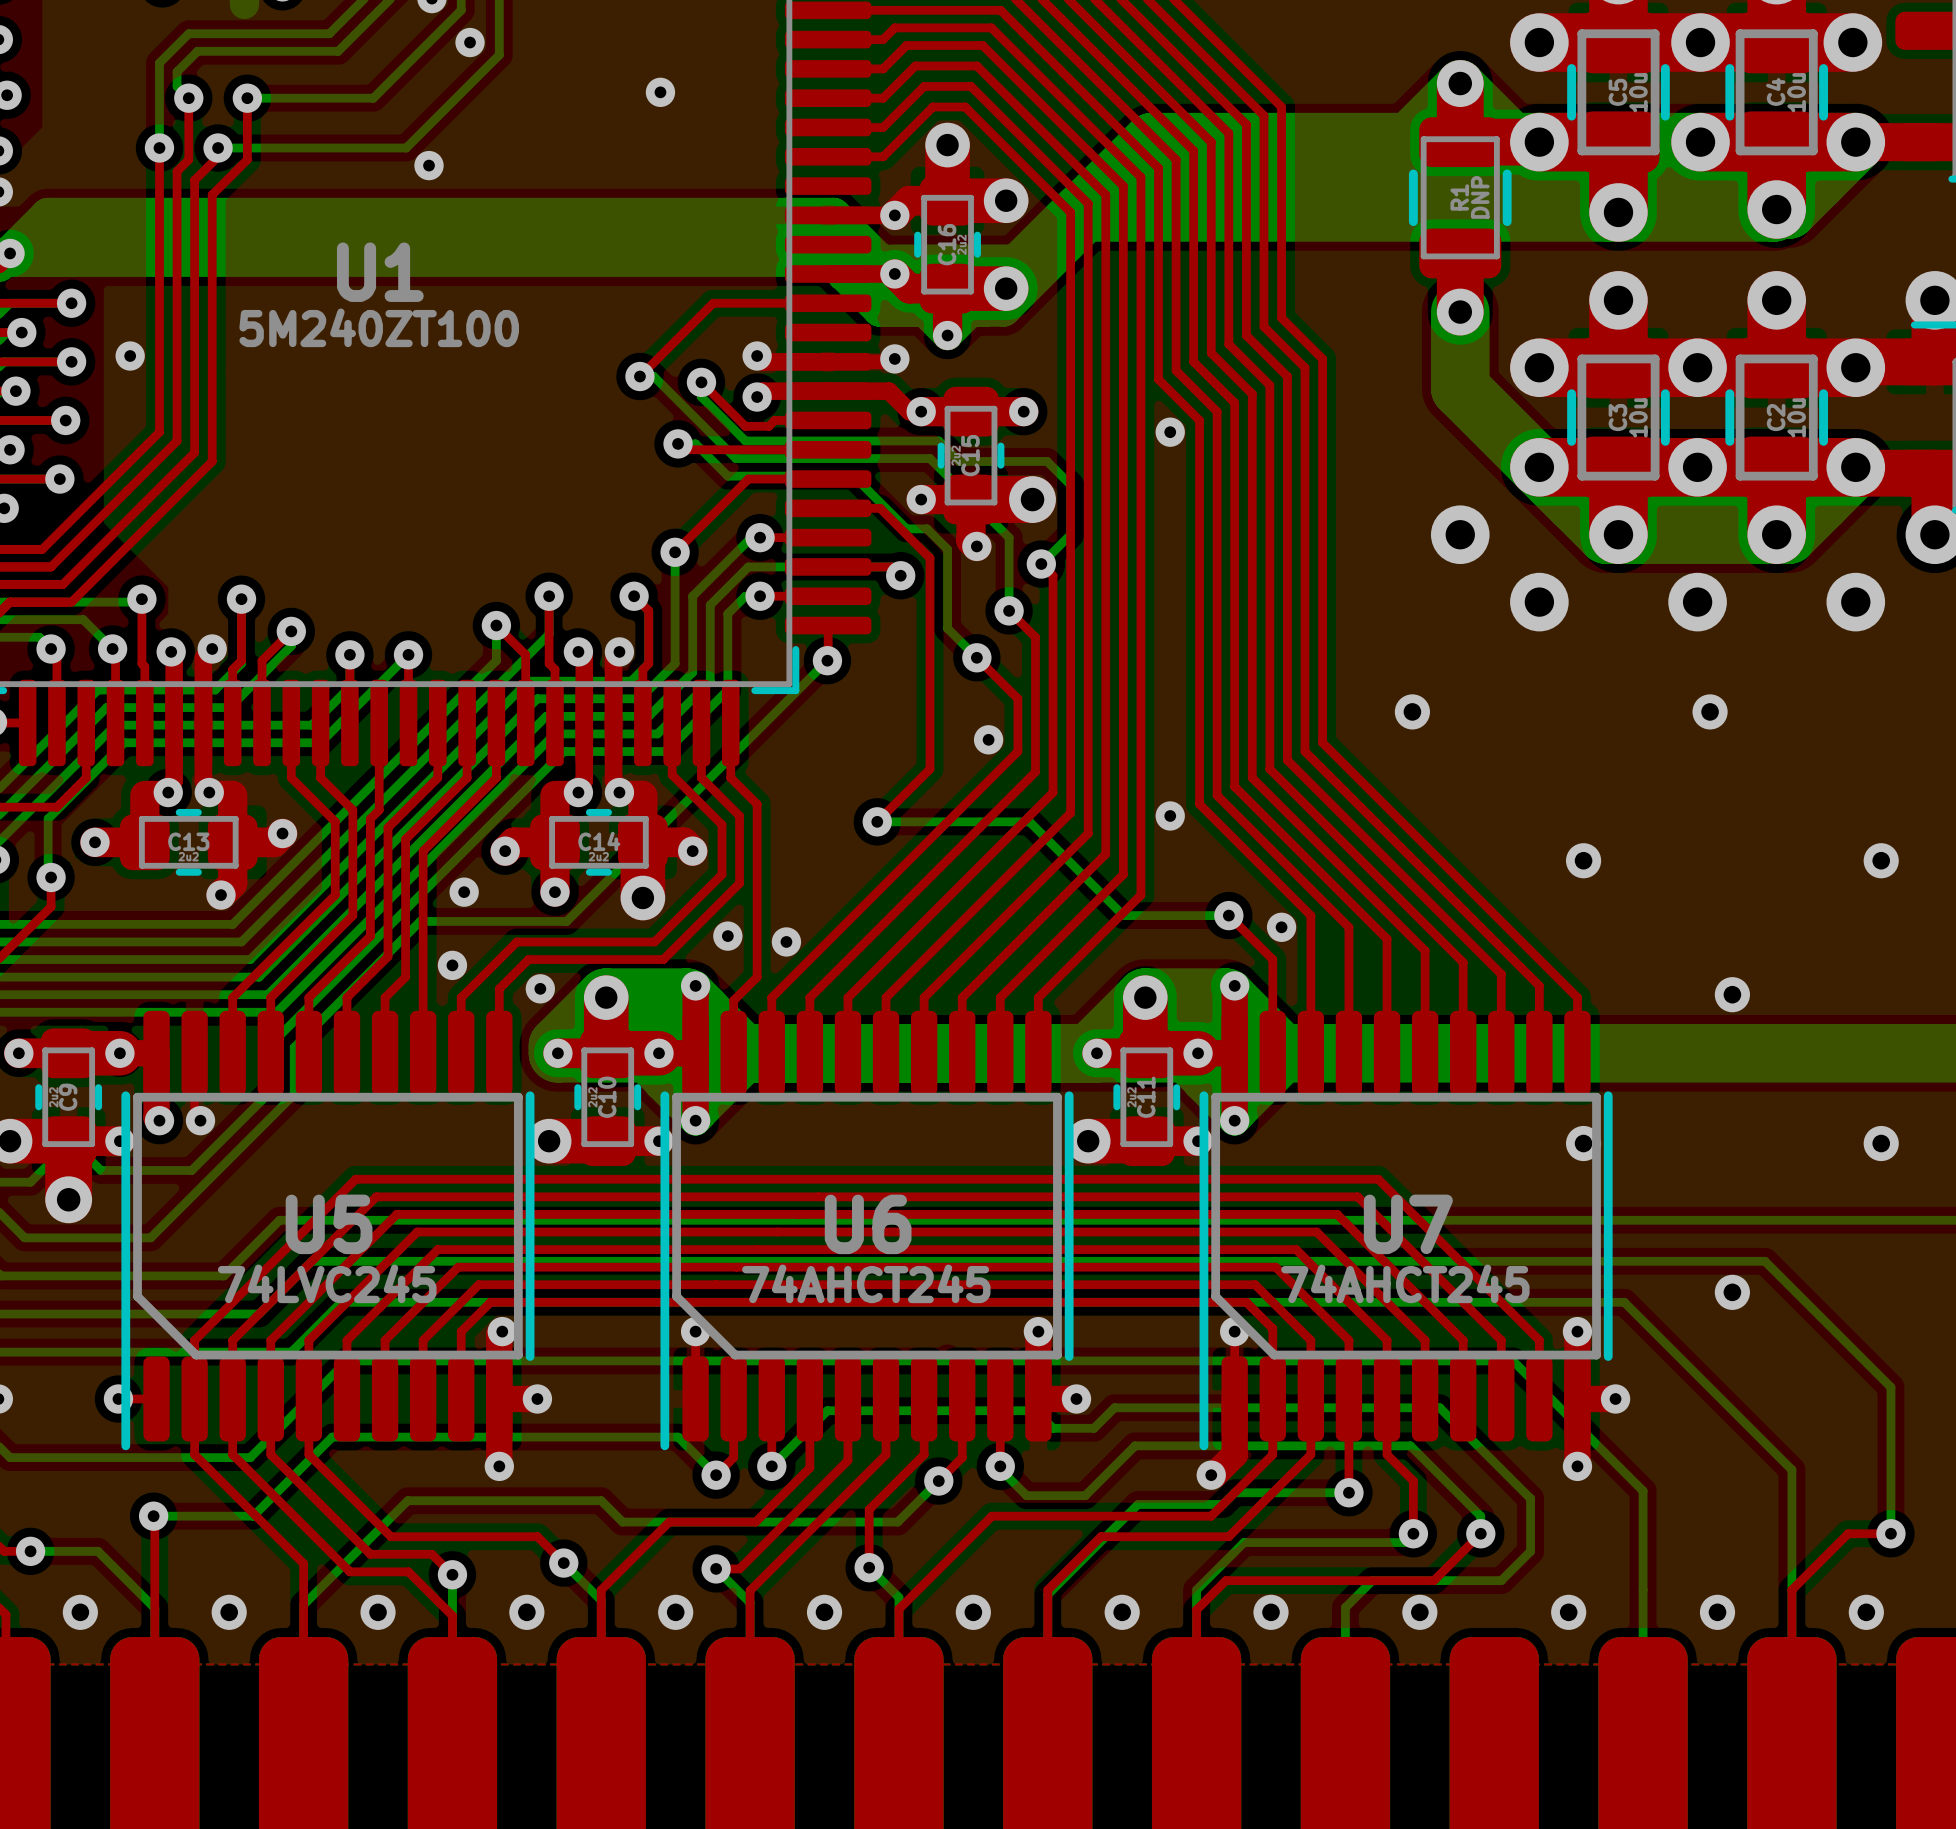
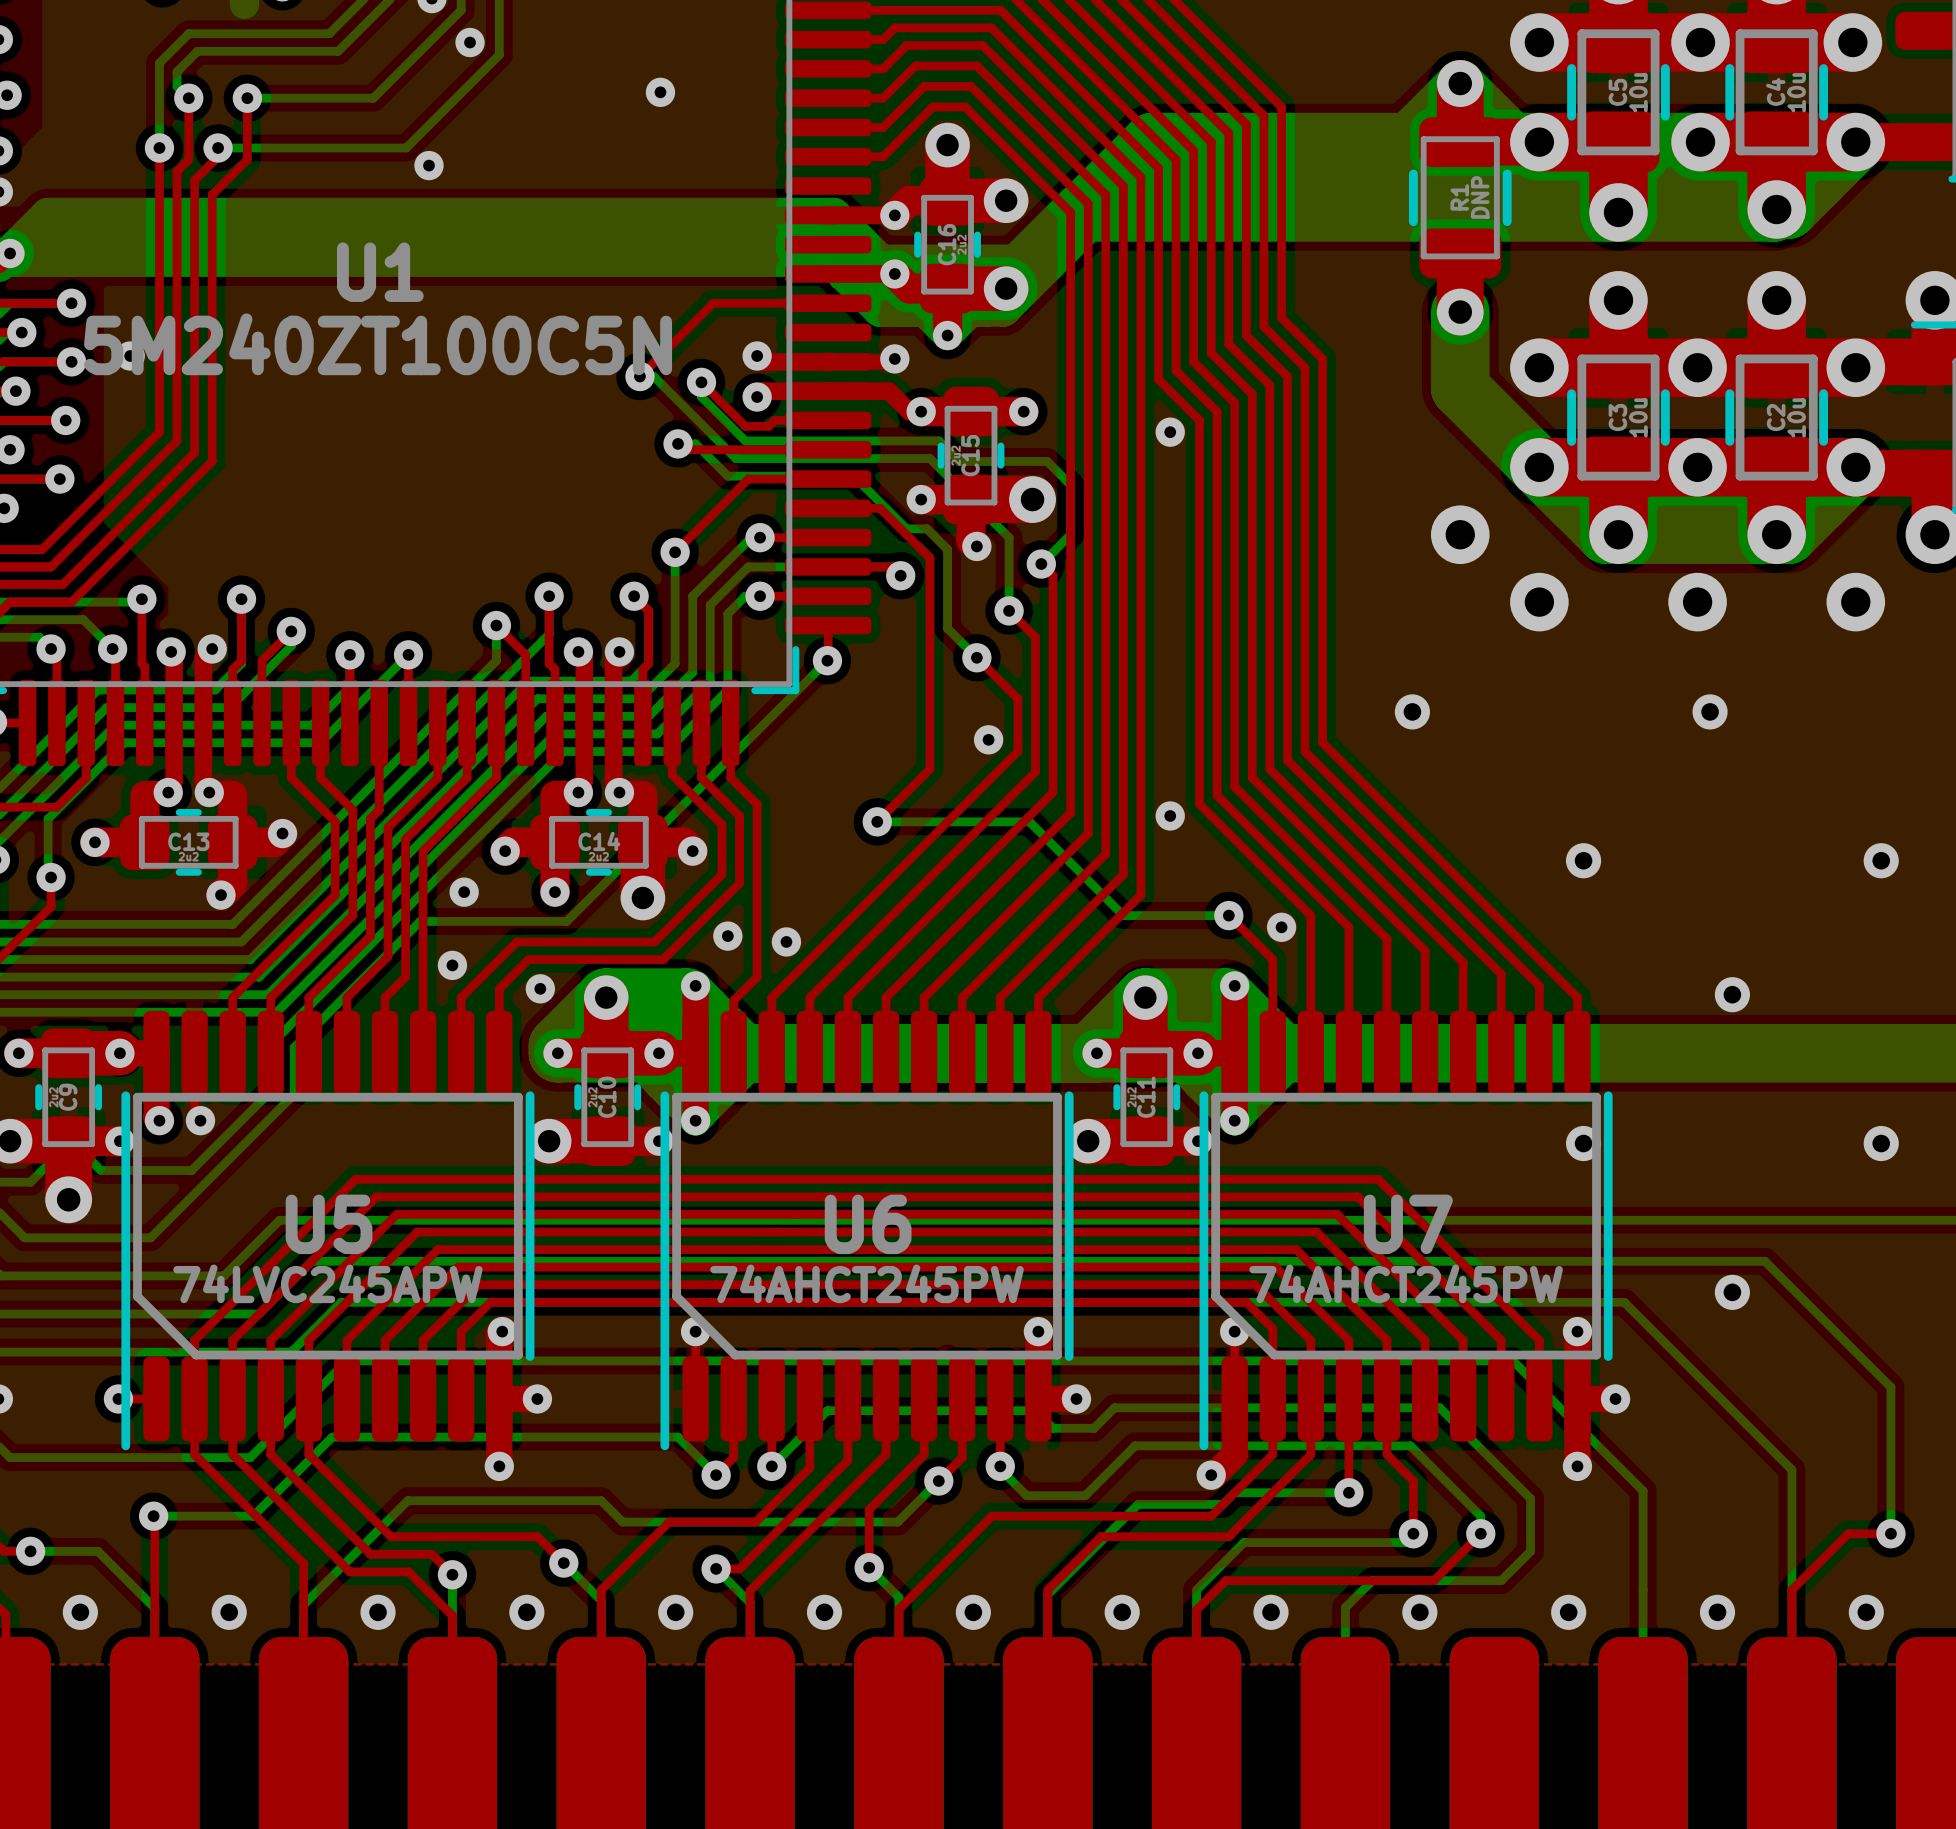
U1 value: 5M240ZT100 (379, 327) -> 5M240ZT100C5N (378, 344)
U5 value: 74LVC245 (327, 1283) -> 74LVC245APW (327, 1283)
U6 value: 74AHCT245 (866, 1283) -> 74AHCT245PW (867, 1283)
U7 value: 74AHCT245 (1405, 1283) -> 74AHCT245PW (1406, 1283)

